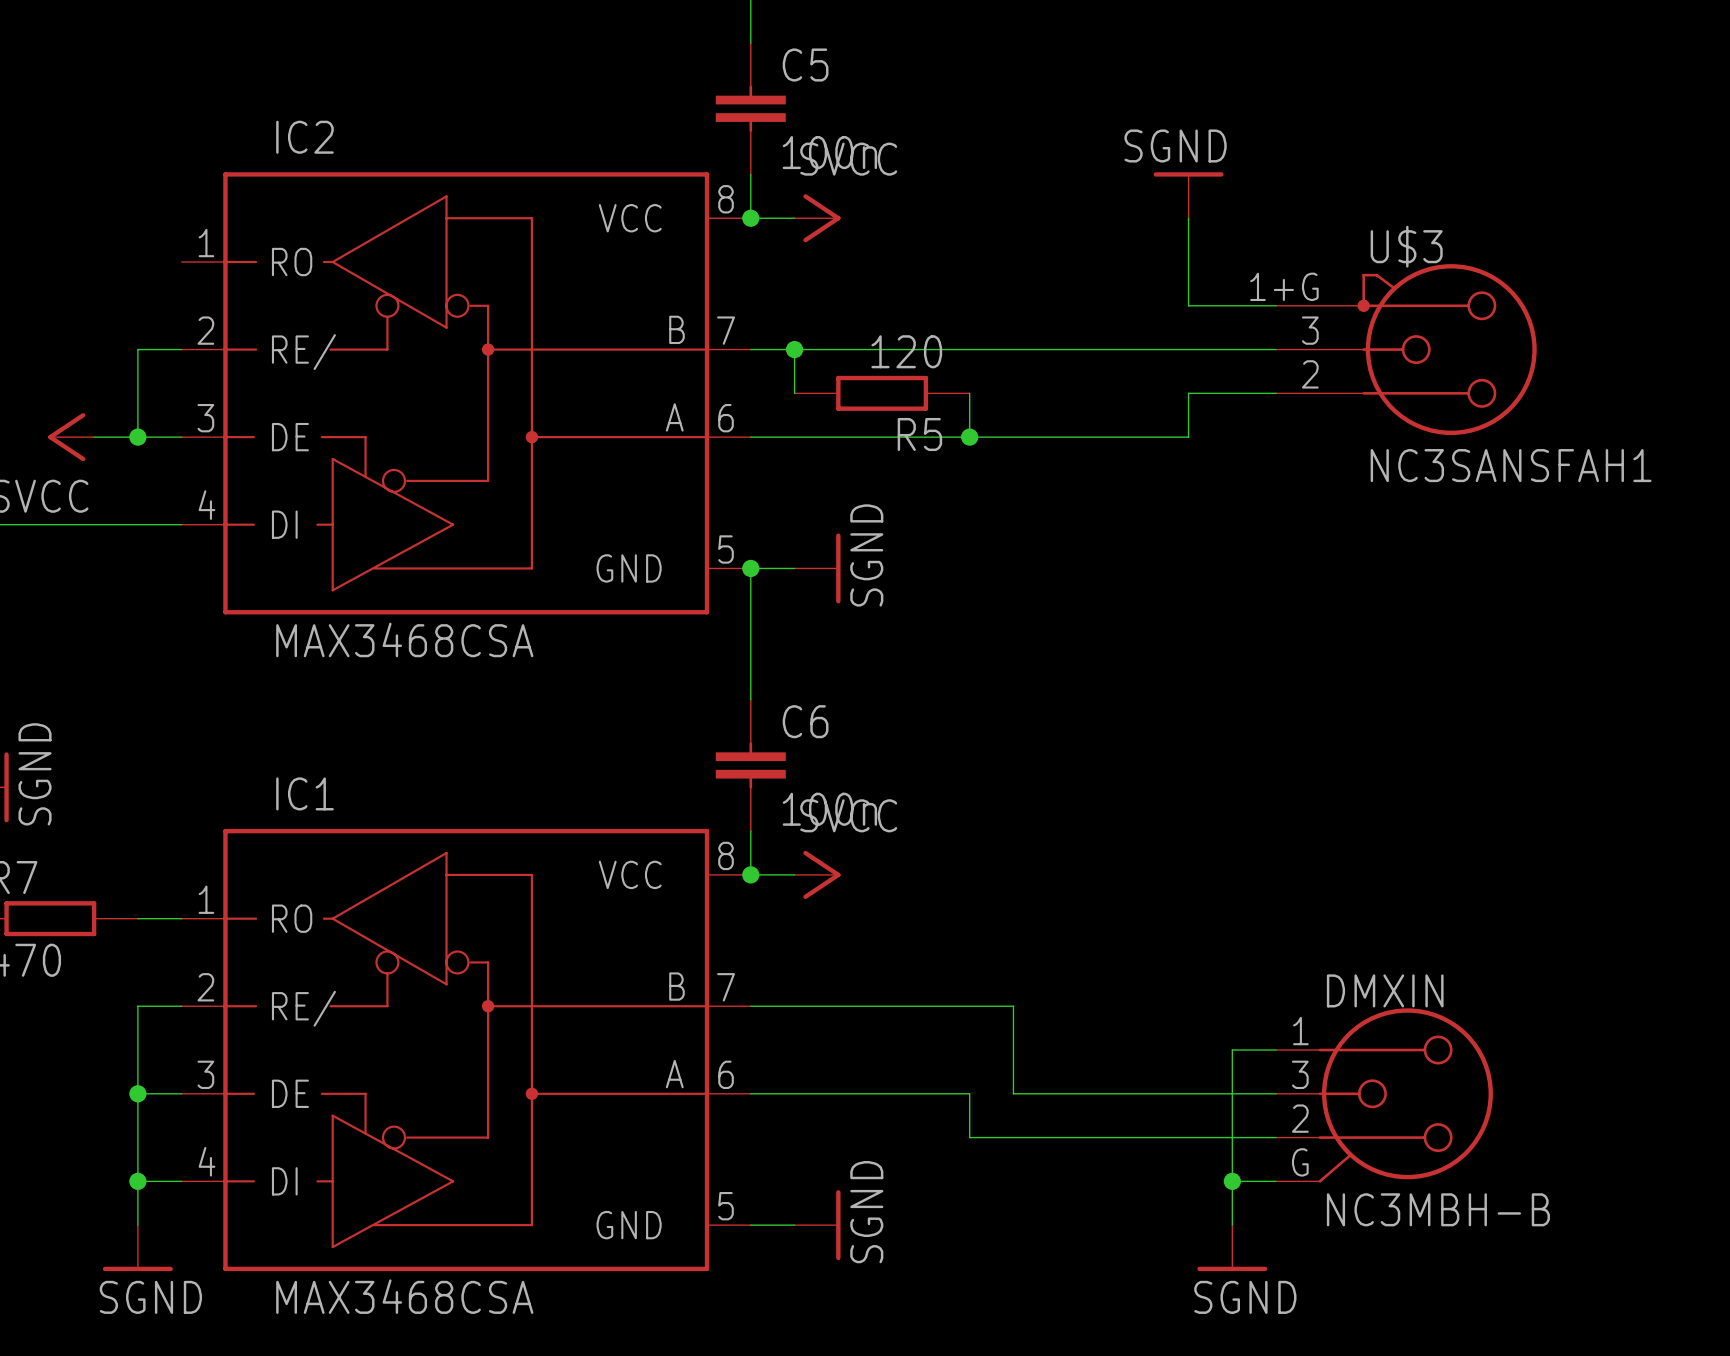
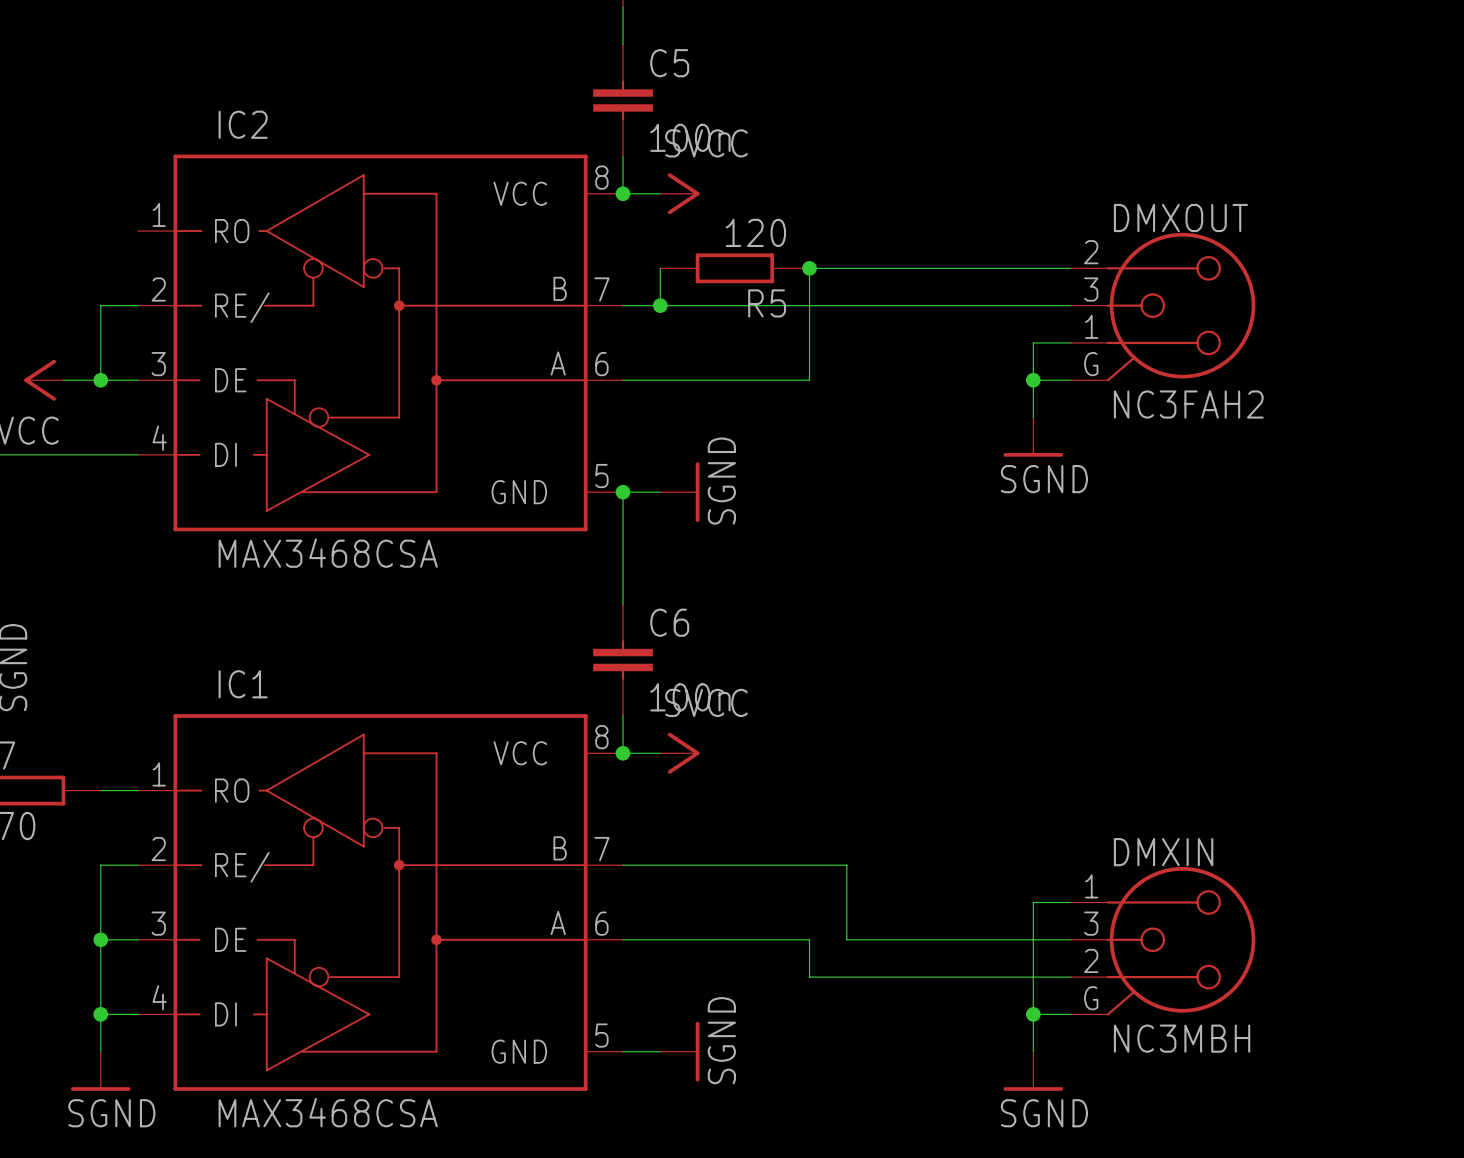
power symbol rotation: 0° (1188, 174) -> 180° (1033, 454)
power symbol position: SGND (1188, 195) -> SGND (1033, 437)
wire: (1188, 218) (1188, 305) -> (809, 342) (809, 268) (996, 268)
junction: none -> (809, 268)
wire: (794, 349) (794, 393) -> (660, 305) (660, 268)
U$3: NC3SANSFAH1 (1406, 349) -> none
DMXOUT: none -> NC3FAH2 (1163, 307)
R5 position: (882, 393) -> (734, 268)
wire: (1232, 393) (1188, 393) (1188, 437) (969, 437) -> (1033, 342) (1033, 417)
junction: (969, 437) -> none
wire: none -> (1033, 380) (1070, 380)
junction: none -> (1033, 380)
DMXIN value: NC3MBH-B (1438, 1209) -> NC3MBH (1182, 1038)

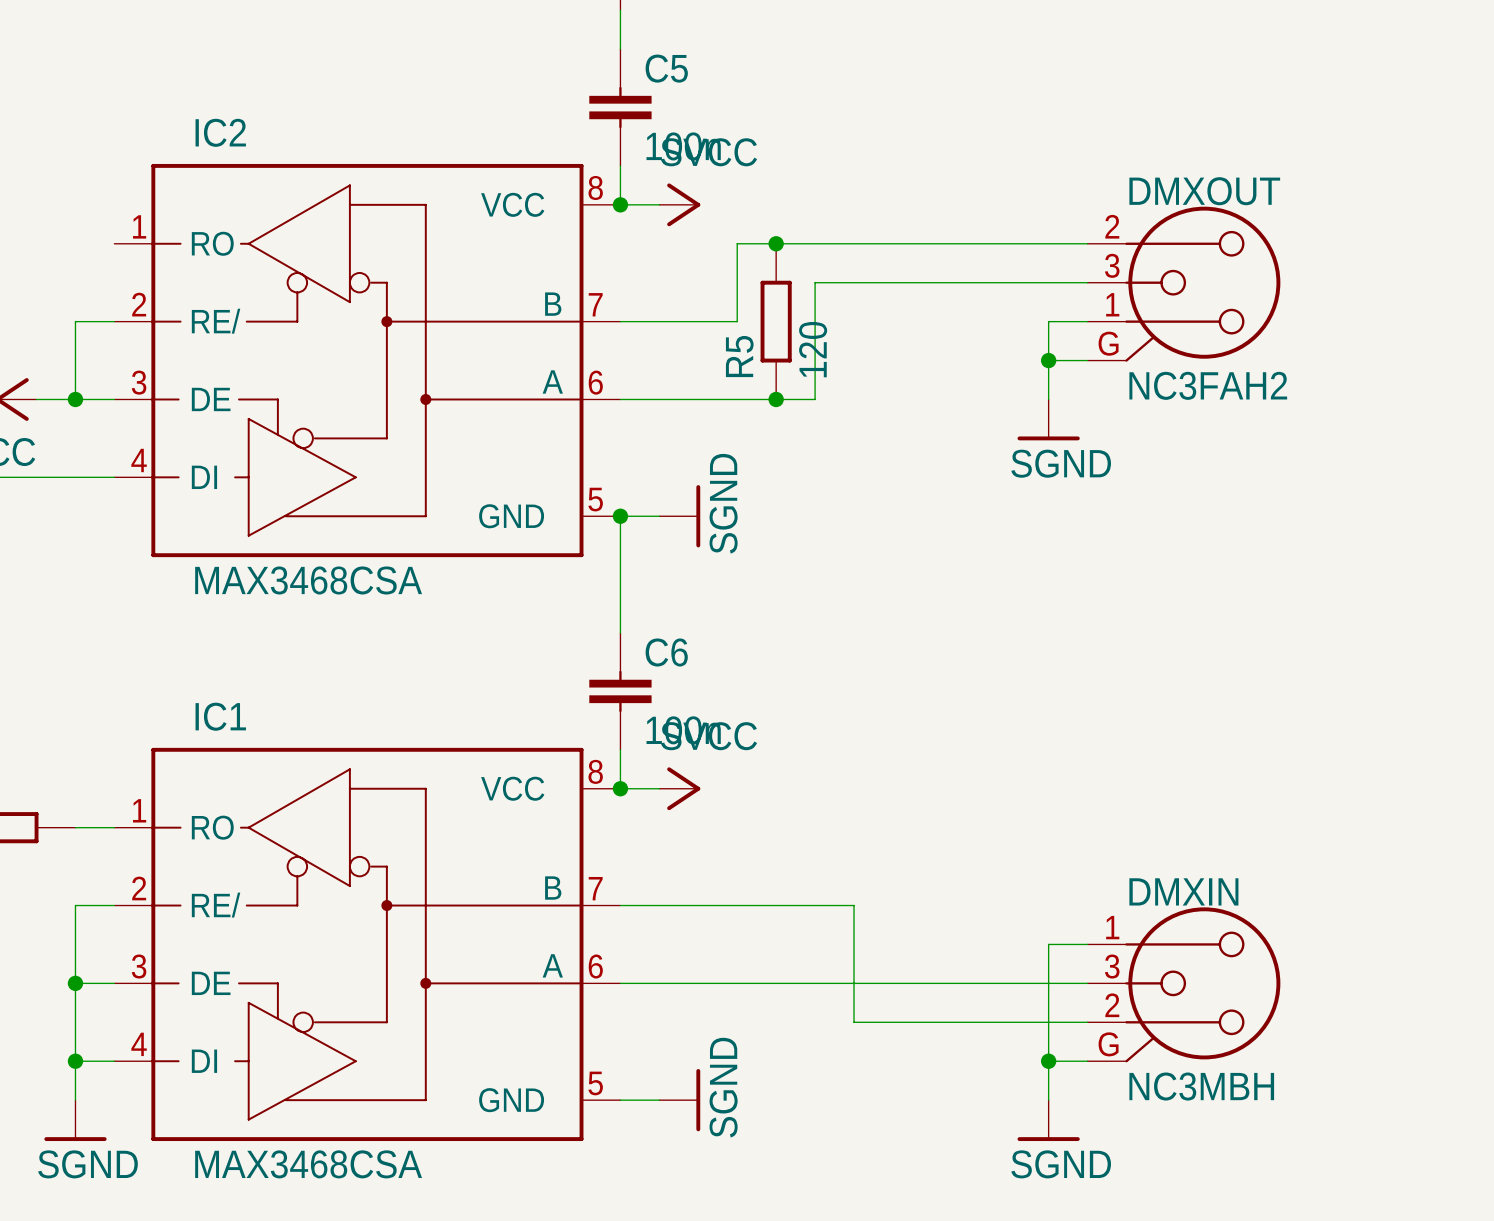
wire: (660, 268) (660, 305) -> none
R5 rotation: 0° (734, 268) -> 90° clockwise (776, 321)
junction position: (809, 268) -> (776, 243)
junction: (660, 305) -> none
wire: (734, 305) (1033, 305) -> (737, 321) (737, 243) (1087, 243)
wire: none -> (1048, 321) (1048, 360)
DMXOUT position: (1163, 307) -> (1183, 284)
junction: none -> (776, 399)
junction position: (1033, 380) -> (1048, 360)
wire: (1070, 380) (1033, 380) (1033, 417) -> none
power symbol position: SGND (1033, 437) -> SGND (1048, 419)
wire: (809, 939) (809, 977) (846, 977) -> (815, 983) (854, 983) (854, 1022)

